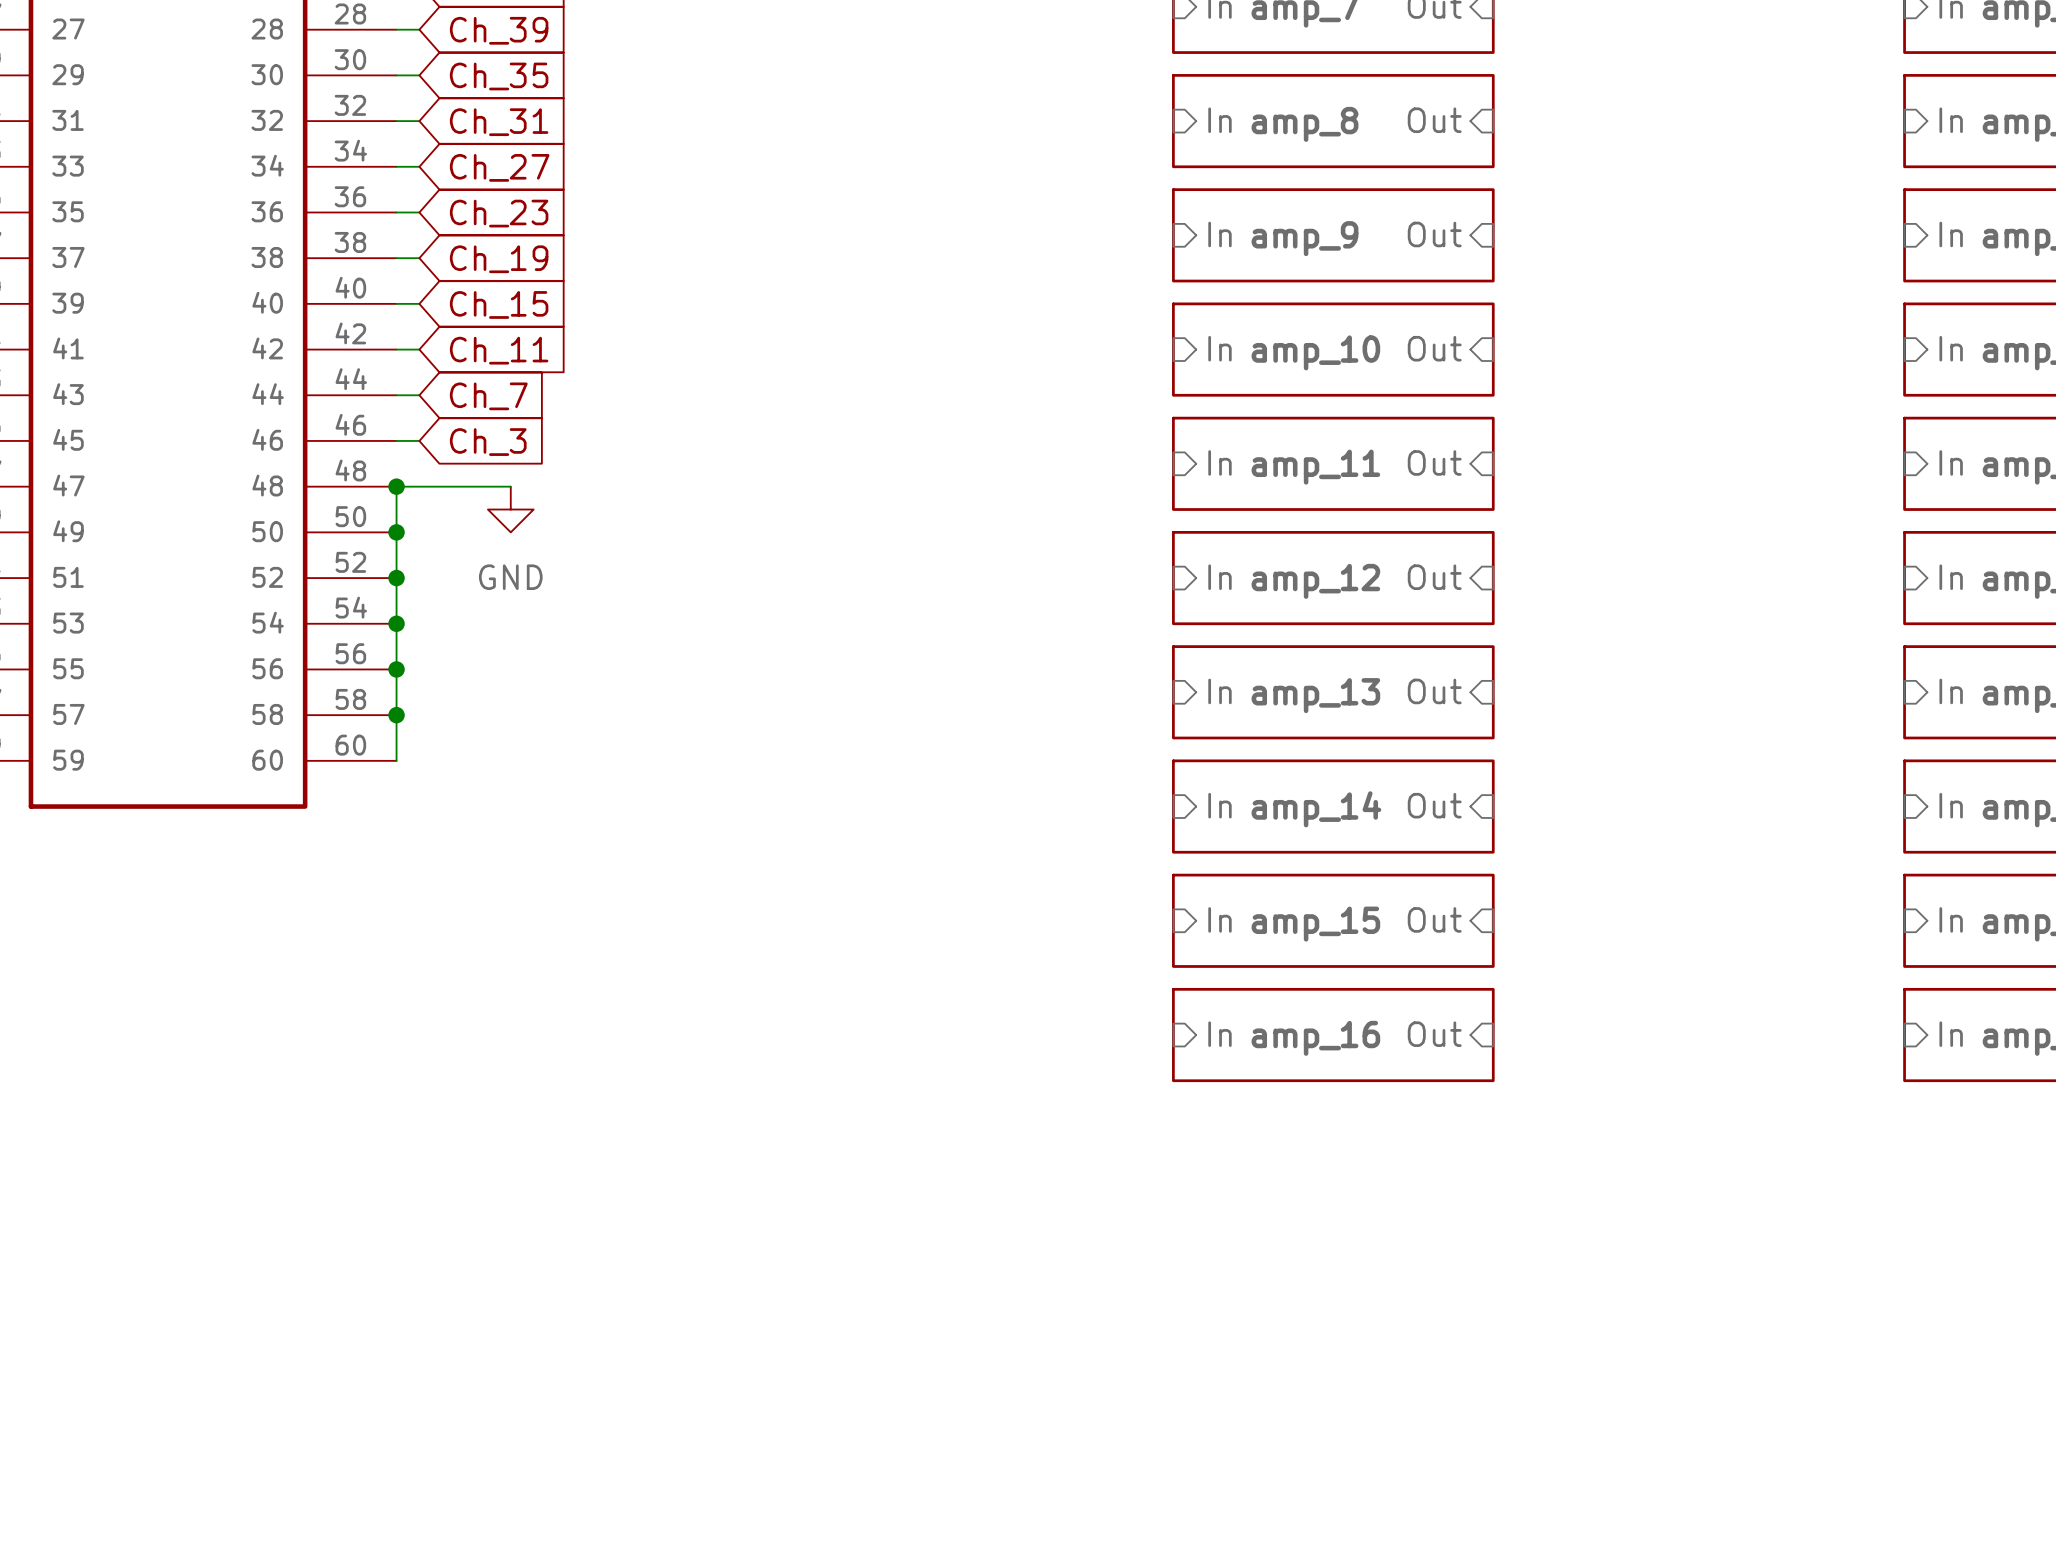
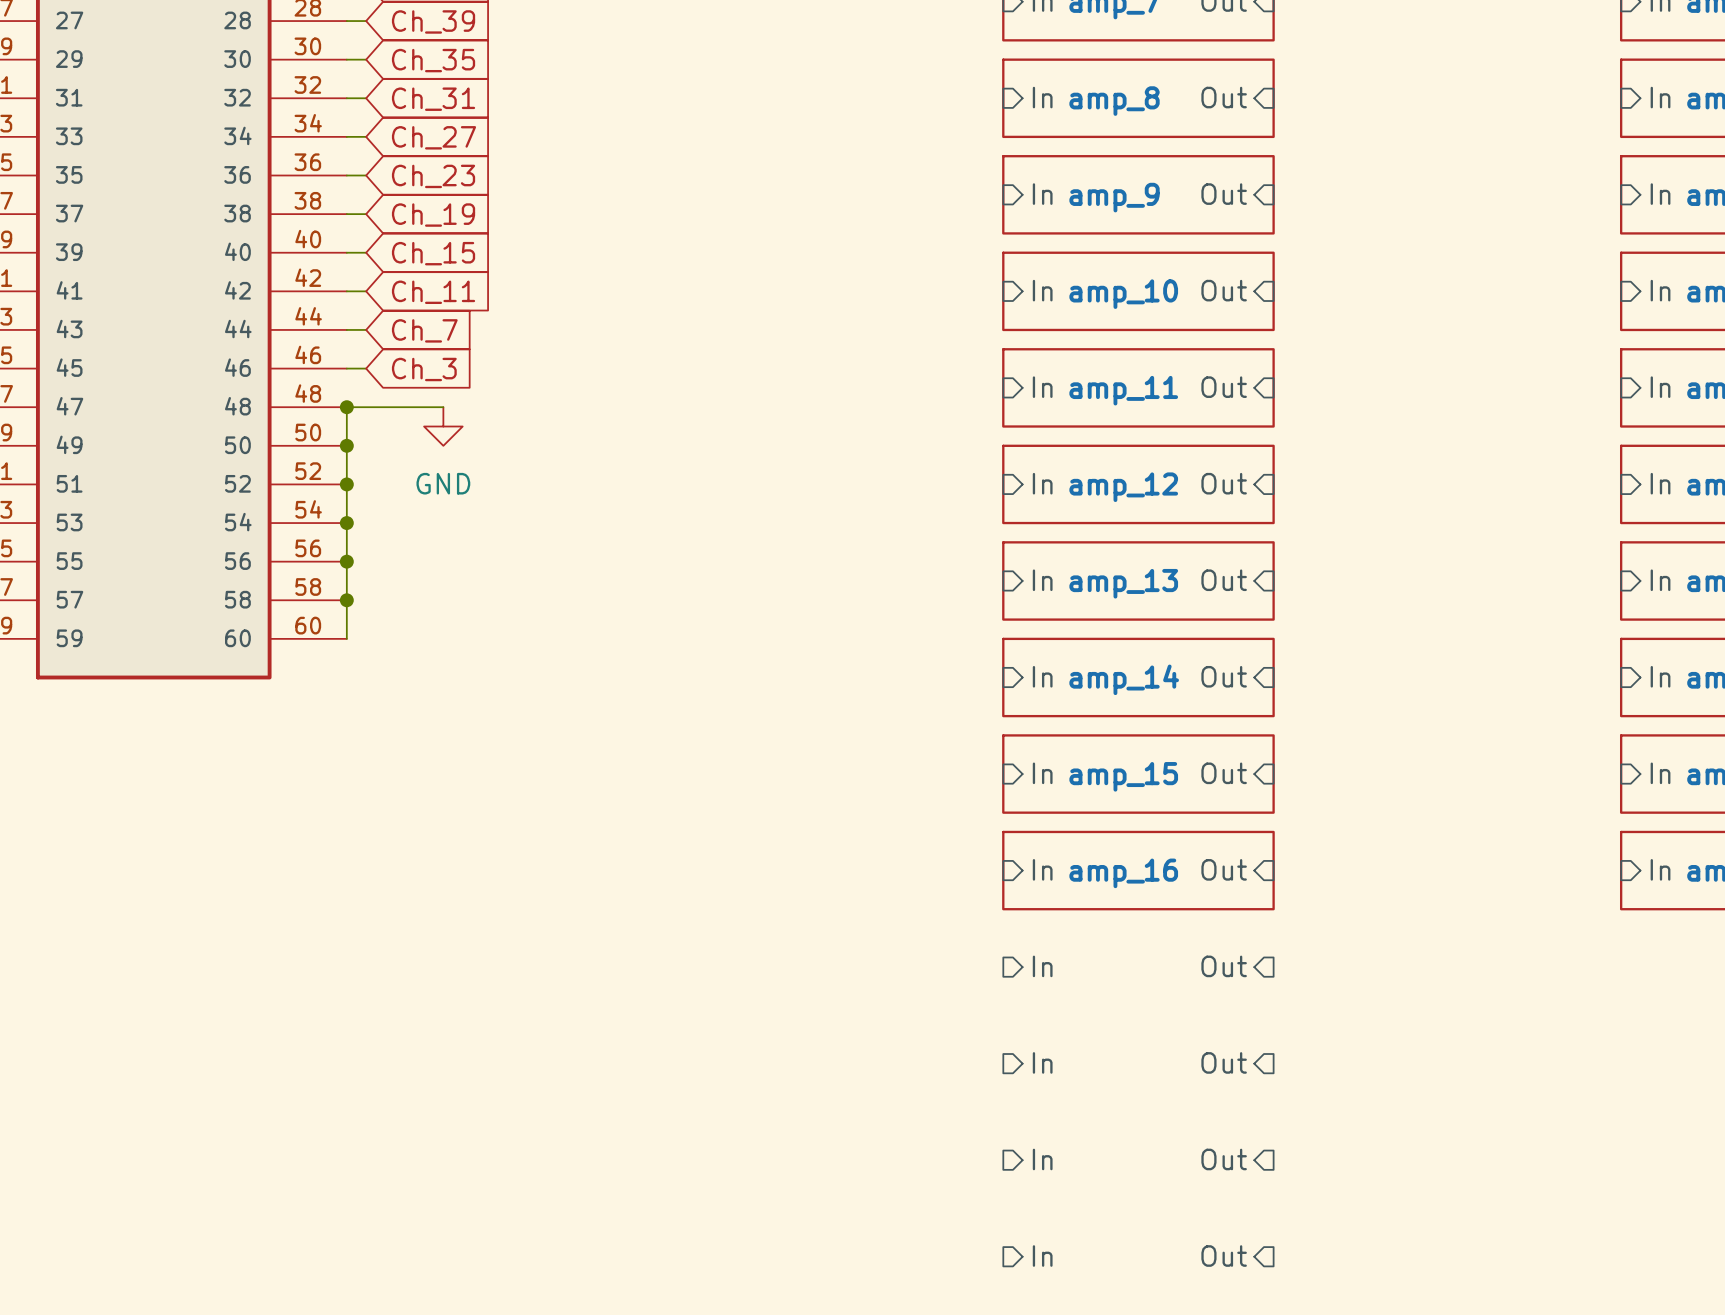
sheet pin: none -> In (1042, 966)
sheet pin: none -> Out (1224, 966)
sheet pin: none -> In (1042, 1062)
sheet pin: none -> Out (1224, 1062)
sheet pin: none -> In (1042, 1159)
sheet pin: none -> Out (1224, 1159)
sheet pin: none -> In (1042, 1256)
sheet pin: none -> Out (1224, 1256)

